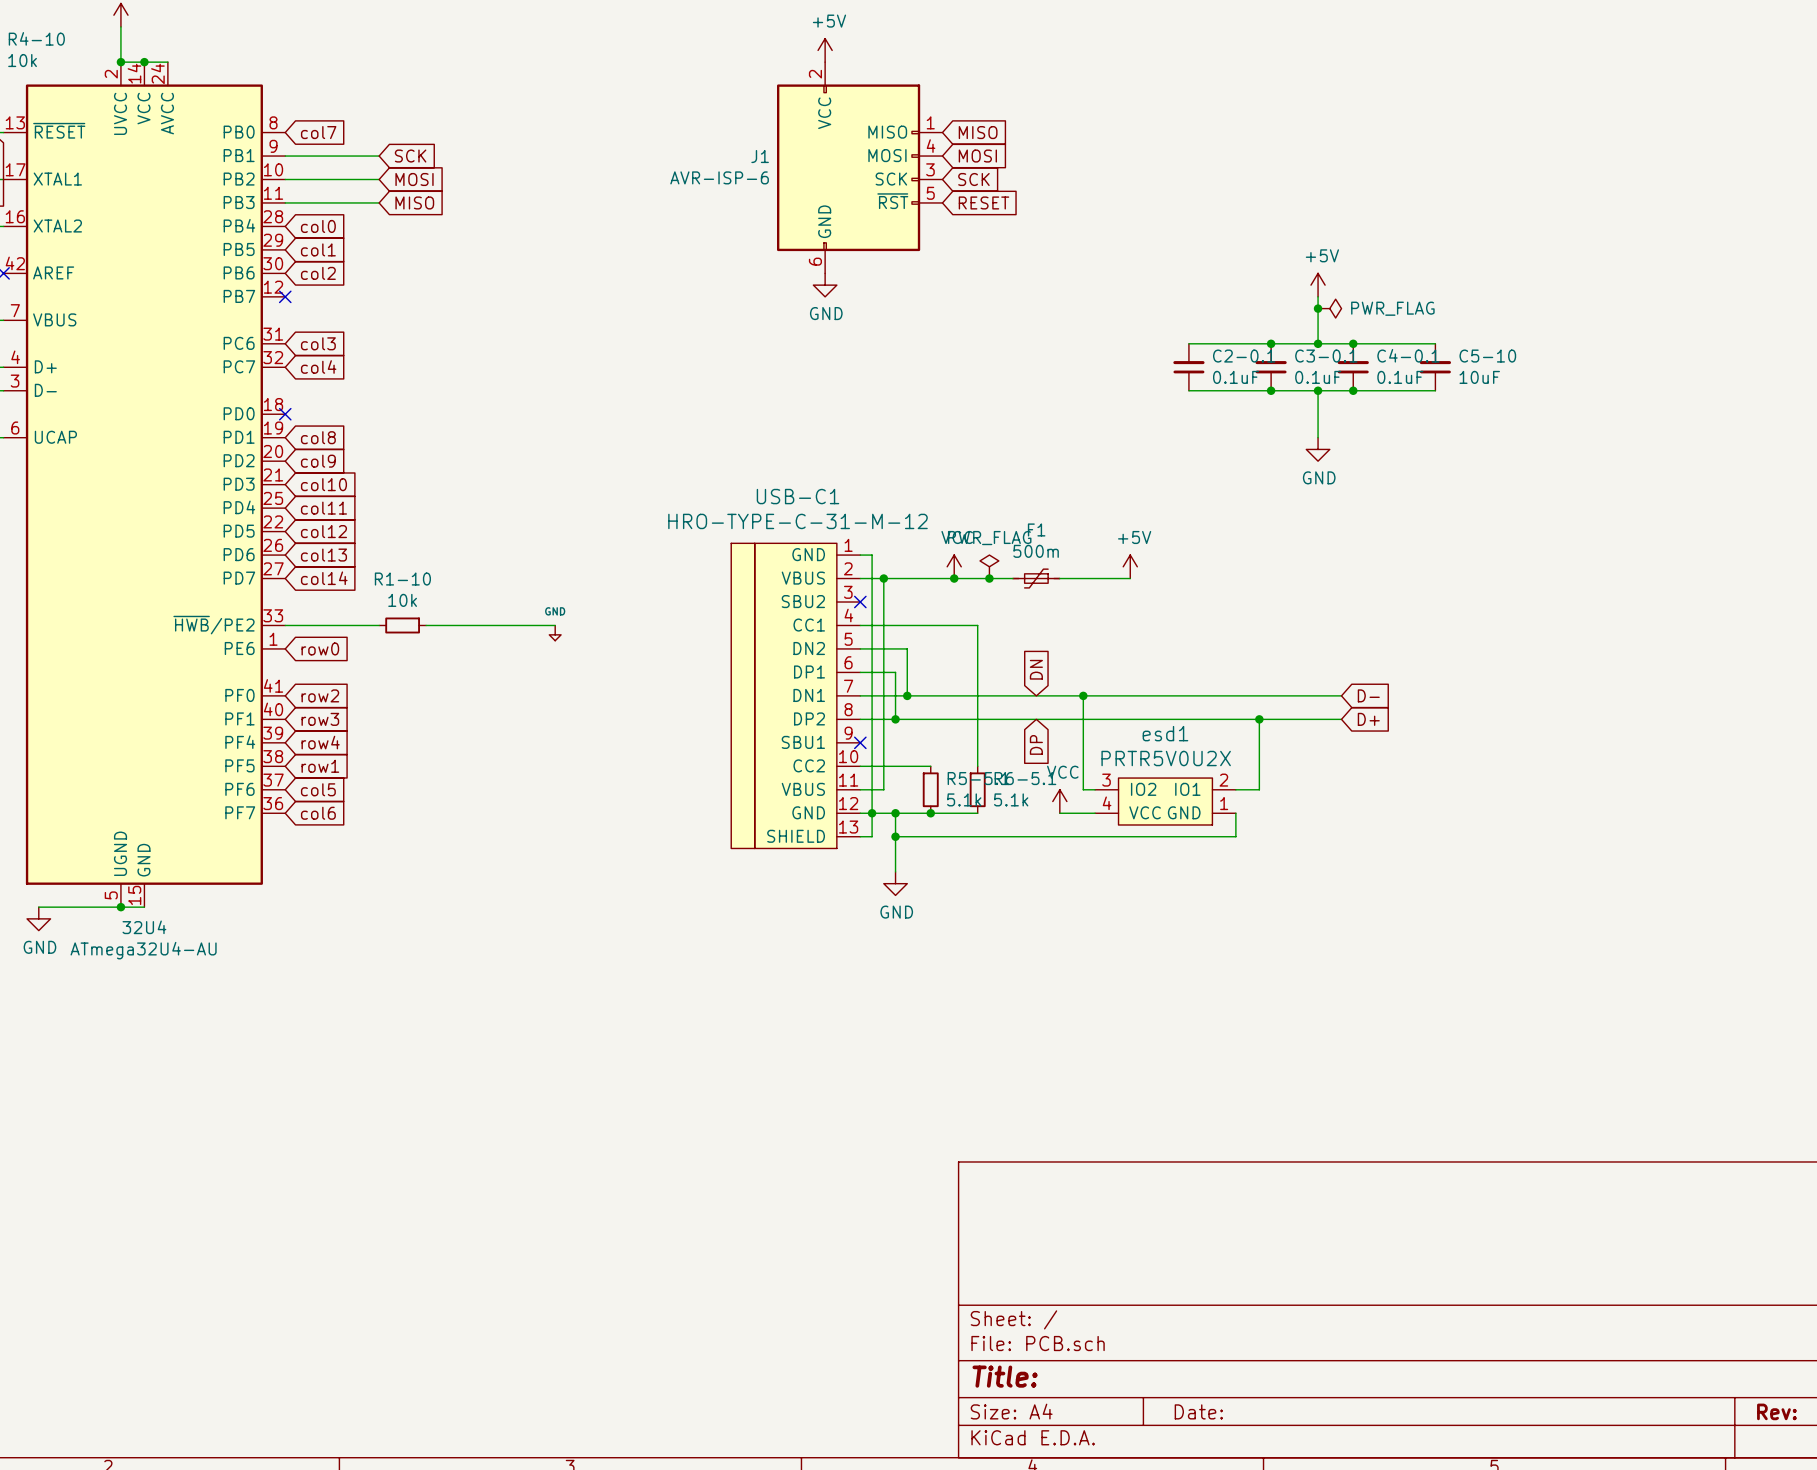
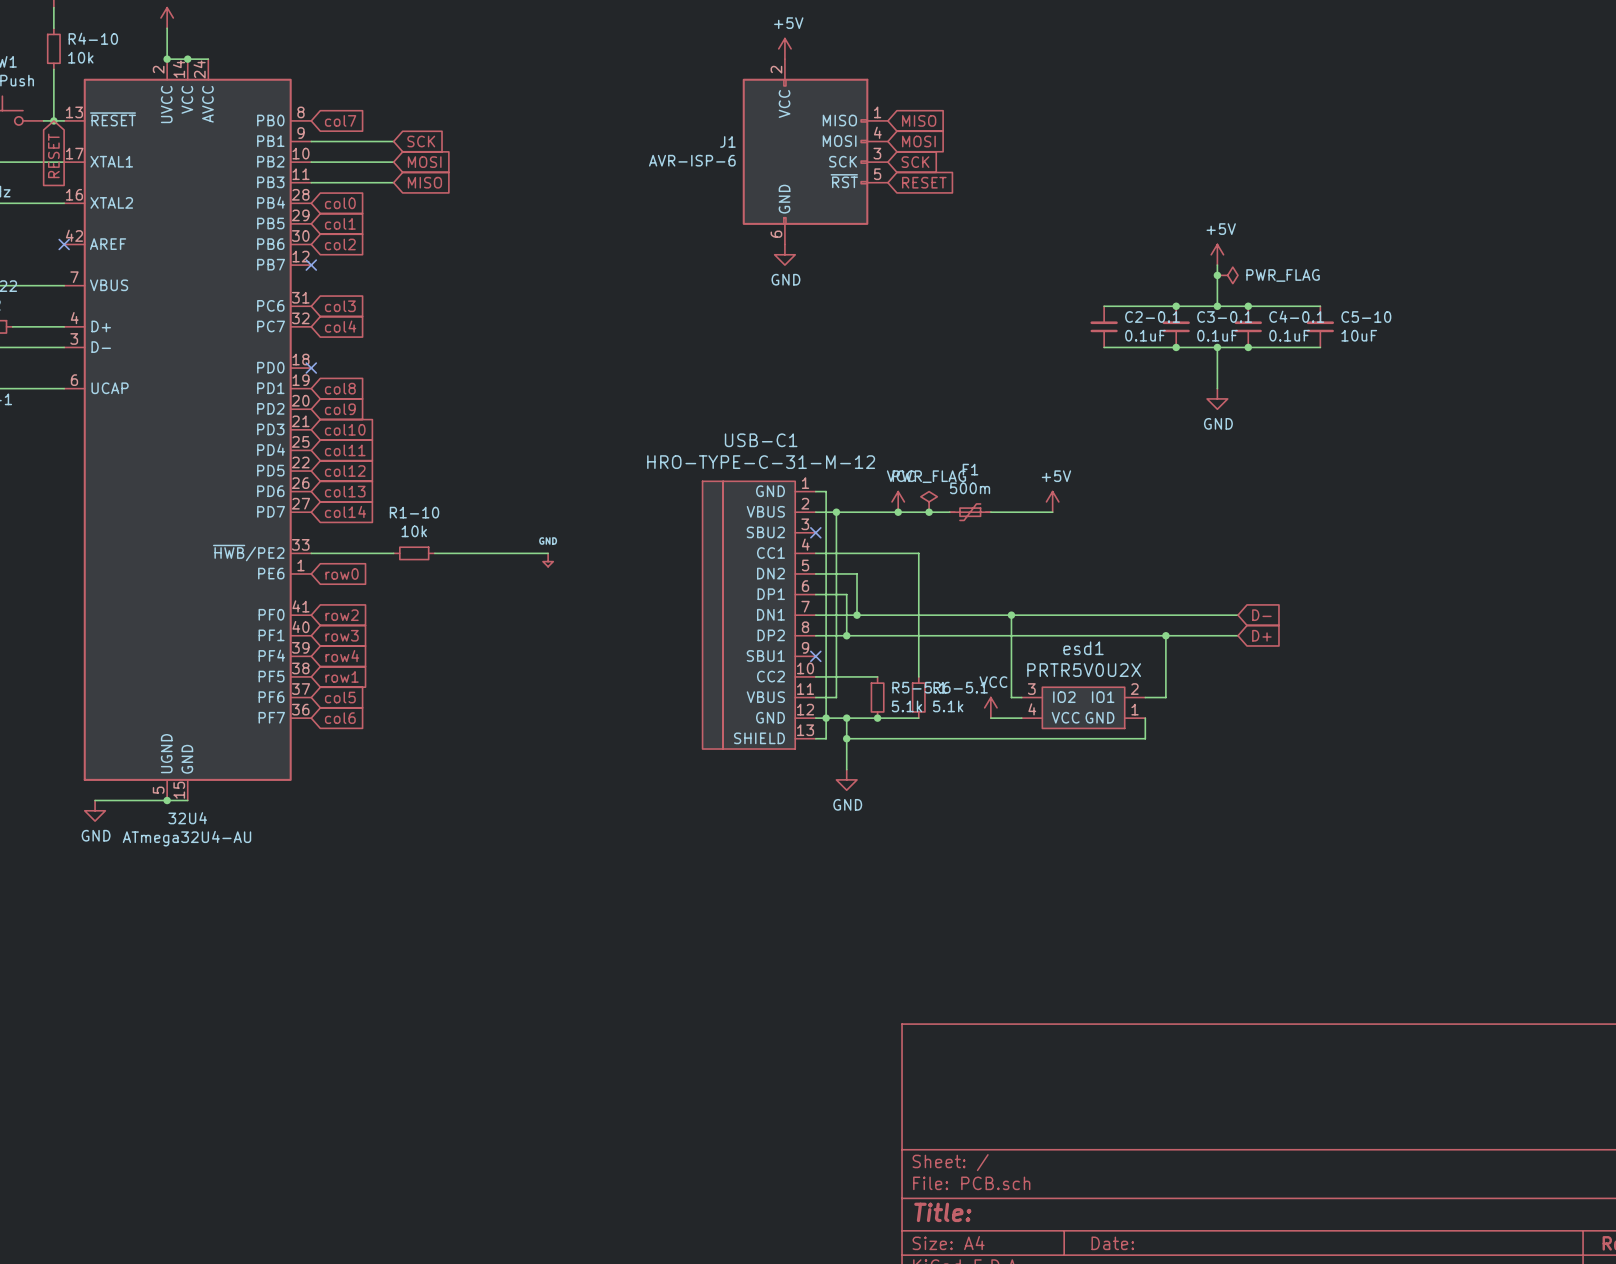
global label: DN (1036, 669) -> none
global label: DP (1036, 744) -> none

